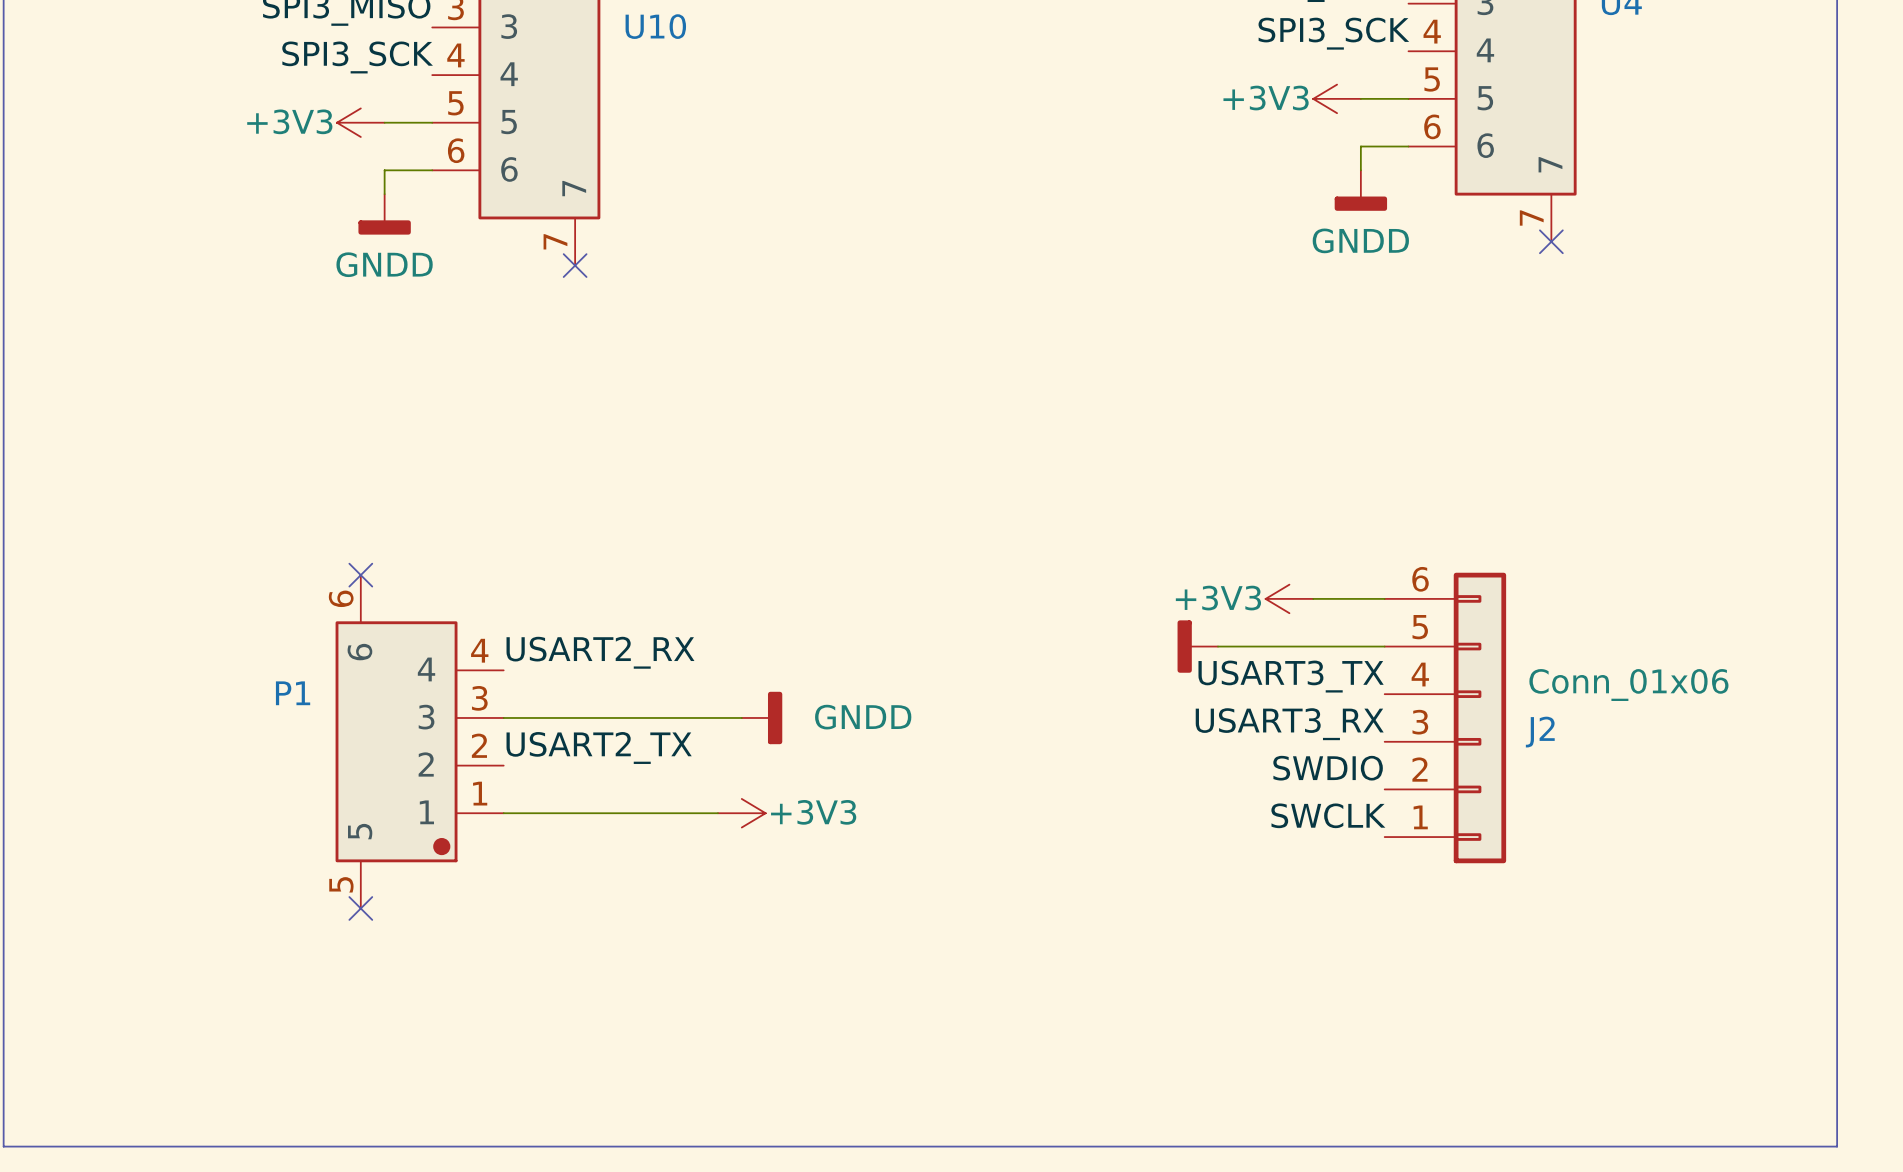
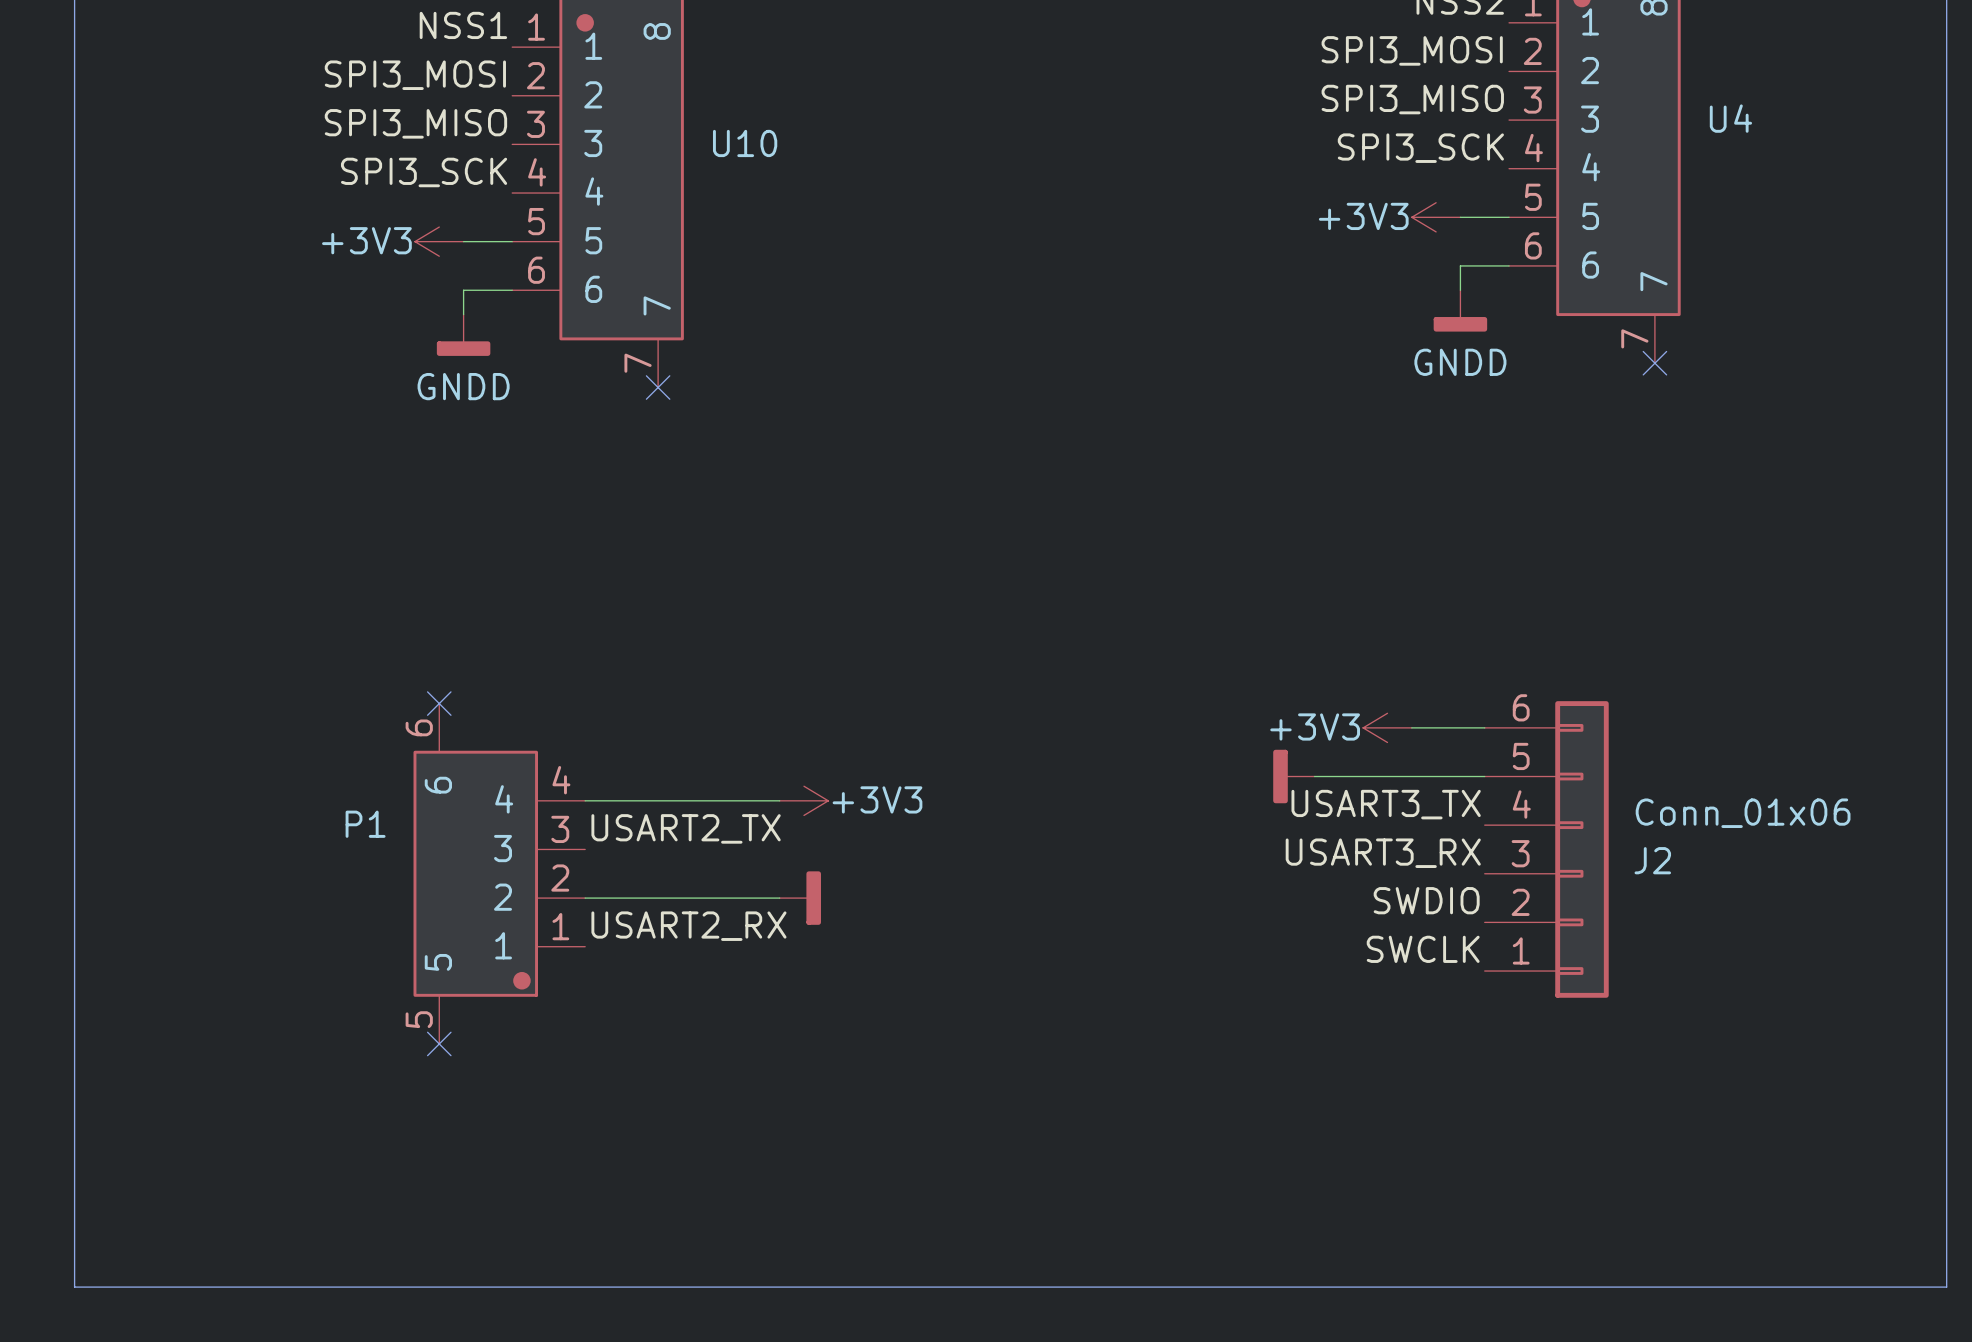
label position: USART2_RX (600, 652) -> USART2_RX (688, 926)
wire: none -> (585, 800) (779, 800)
wire: (503, 717) (741, 717) -> none
power symbol: GNDD (762, 717) -> none
label position: USART2_TX (599, 747) -> USART2_TX (686, 828)
wire: none -> (585, 898) (779, 898)
power symbol: none -> (800, 898)
wire: (503, 813) (717, 813) -> none
power symbol position: +3V3 (741, 813) -> +3V3 (803, 800)

